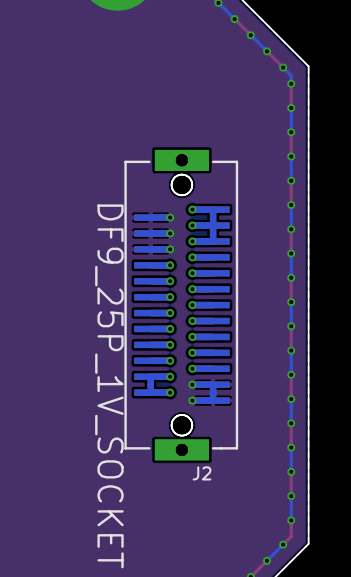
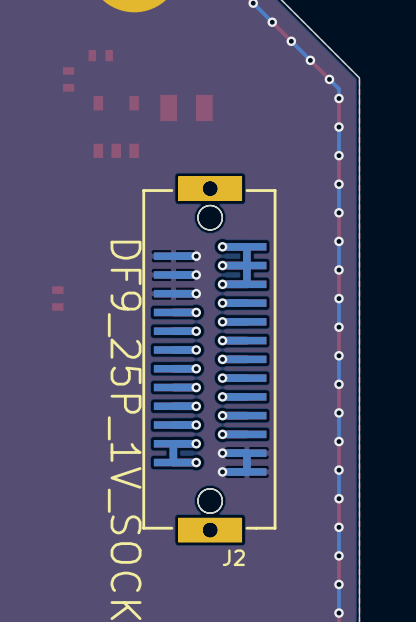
part: none -> (100, 55)
part: none -> (68, 79)
part: none -> (186, 107)
part: none -> (116, 127)
part: none -> (57, 298)

